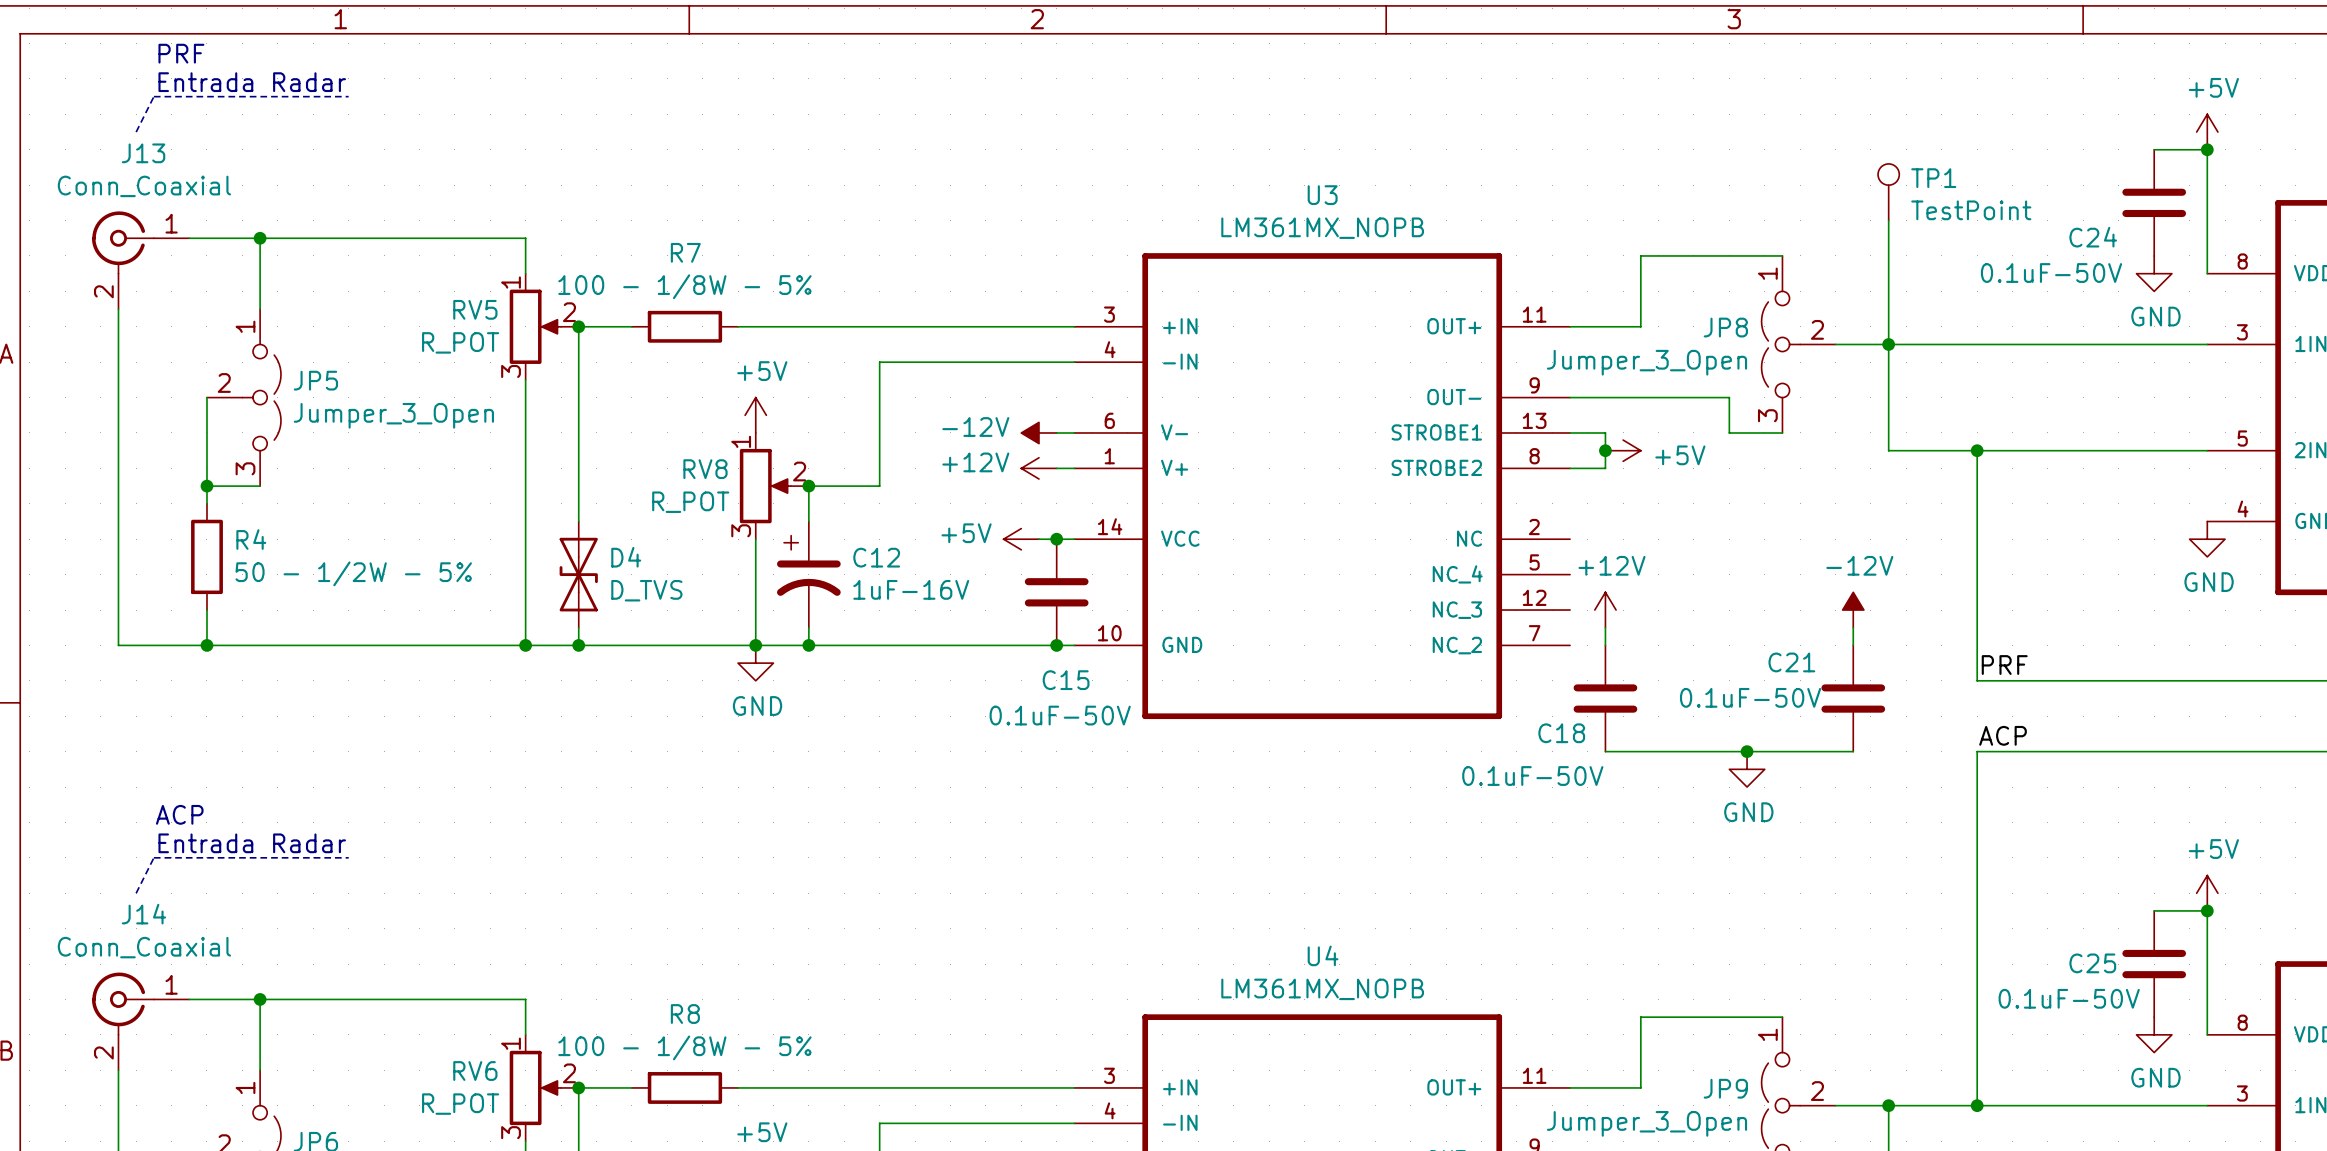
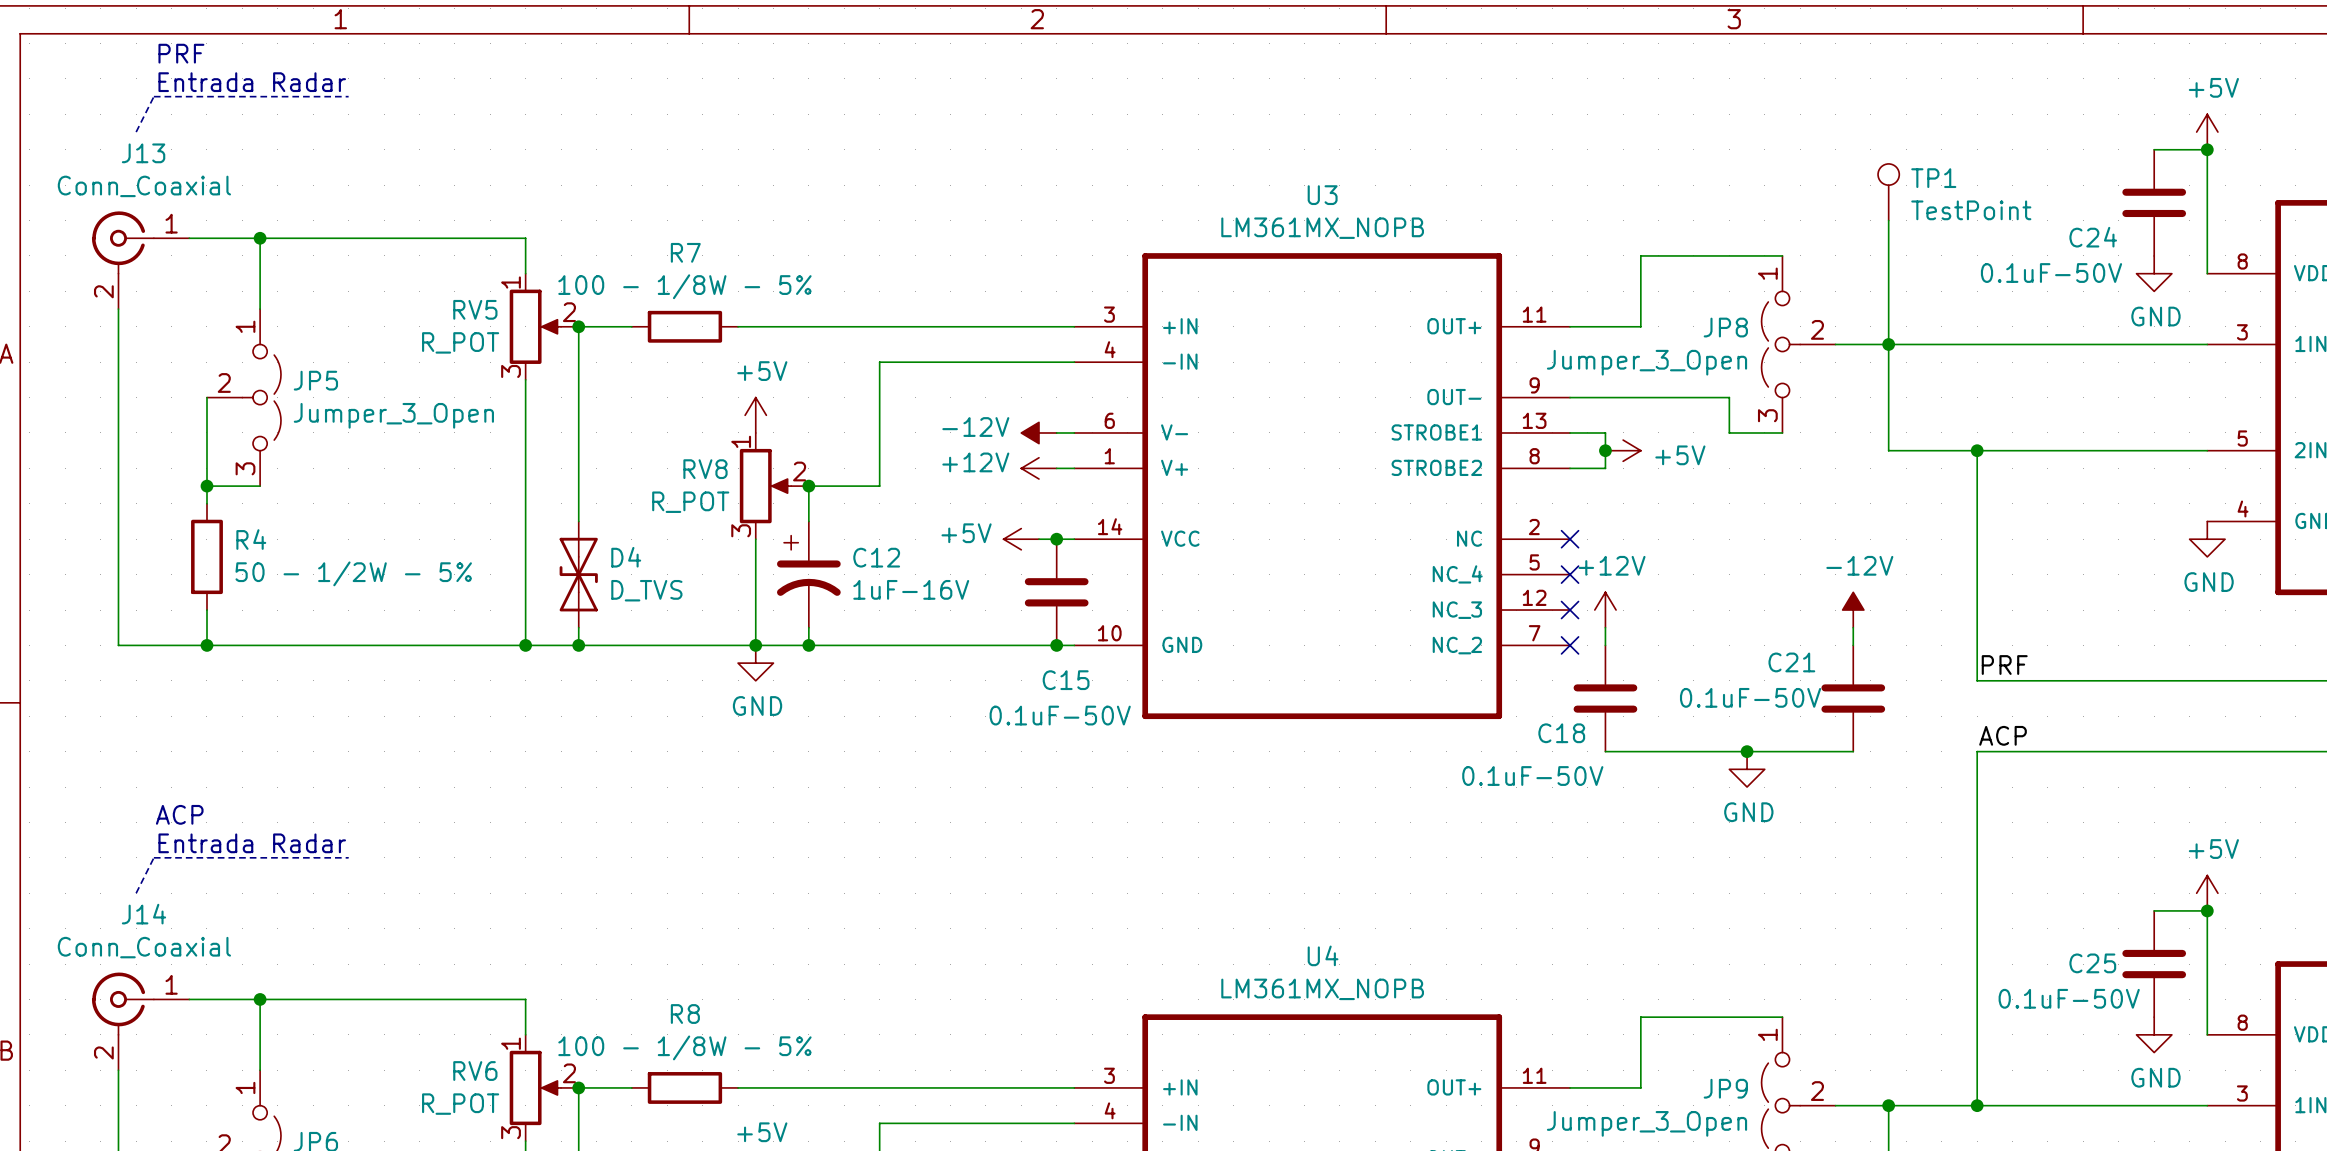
no-connect mark: none -> (1570, 539)
no-connect mark: none -> (1570, 574)
no-connect mark: none -> (1570, 610)
no-connect mark: none -> (1570, 645)

